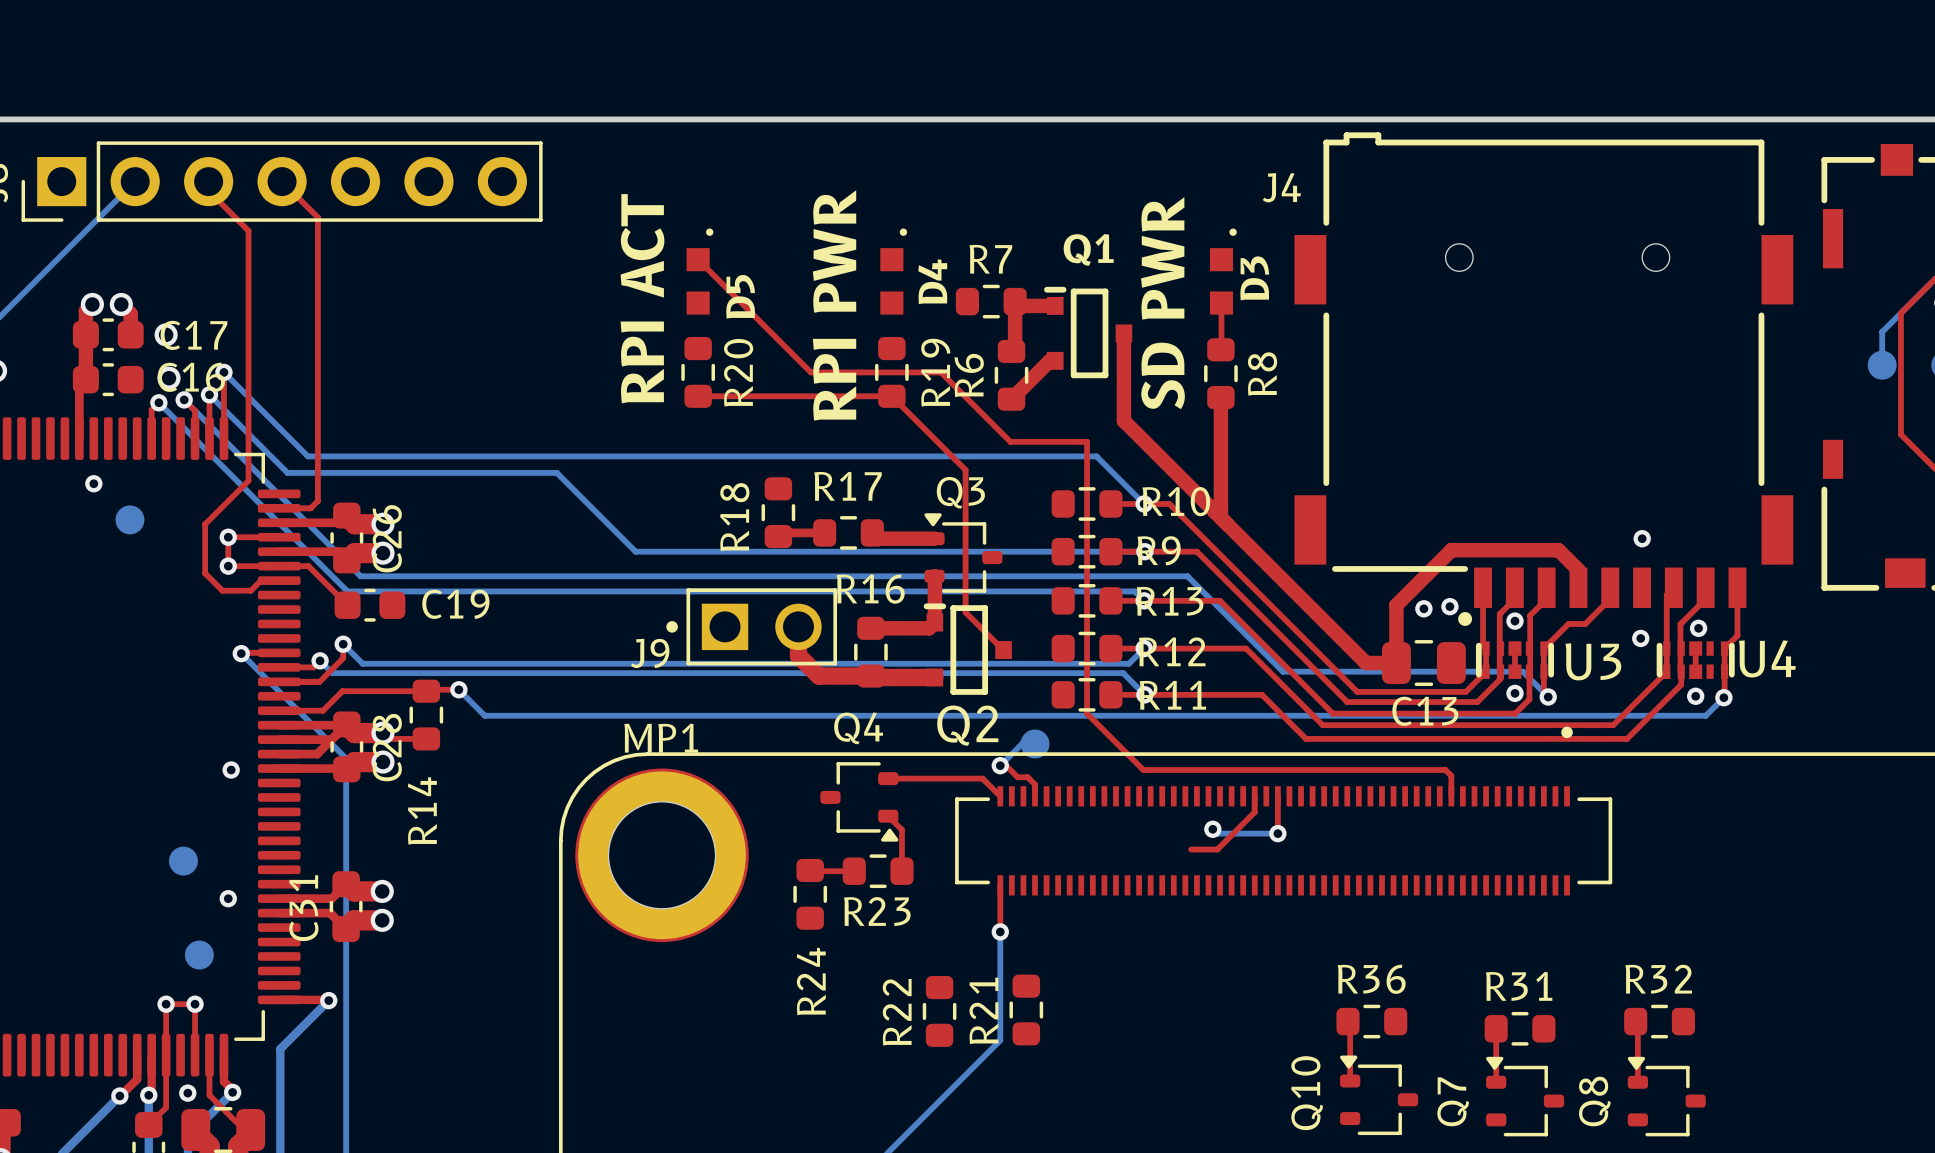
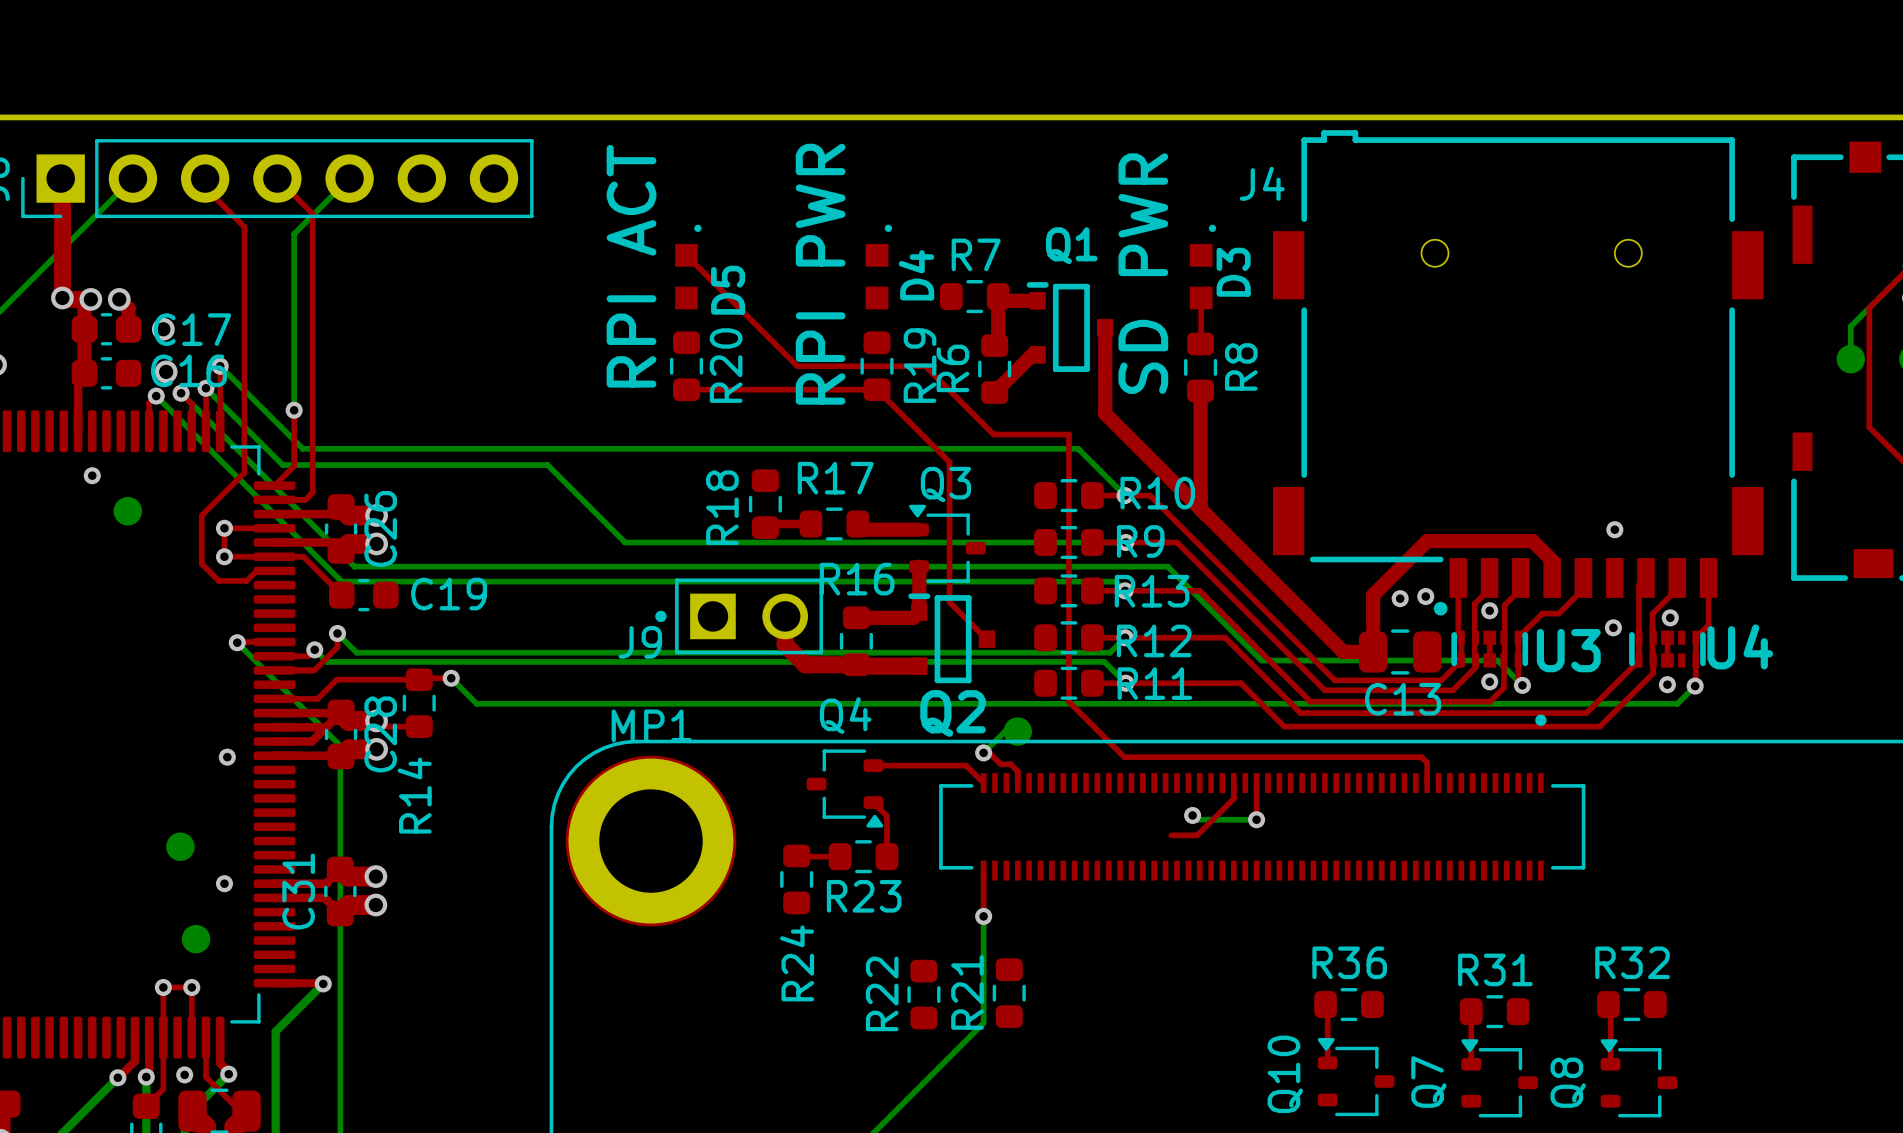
top track: none -> (60, 178) (62, 180) (62, 297) (90, 299)
bottom track: none -> (349, 178) (294, 234) (294, 410)
via: none -> (62, 297)
top track: none -> (294, 410) (294, 466) (274, 485)
via: none -> (294, 410)

